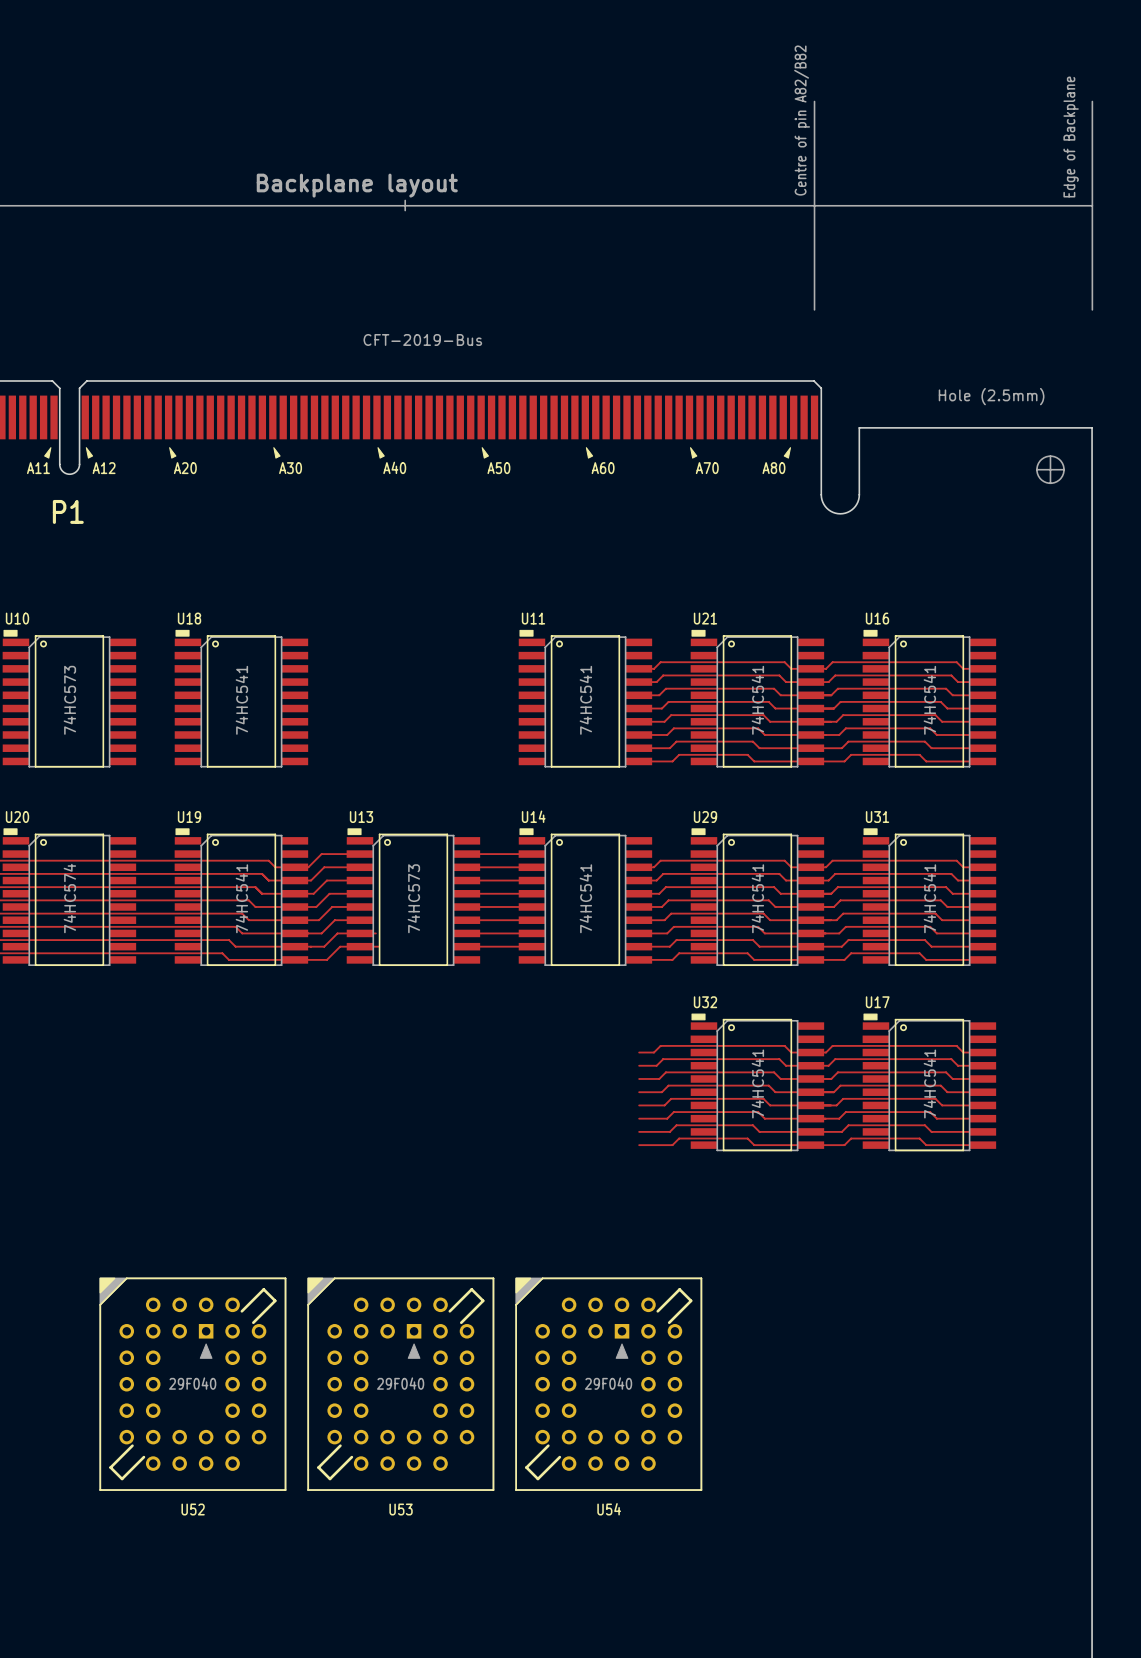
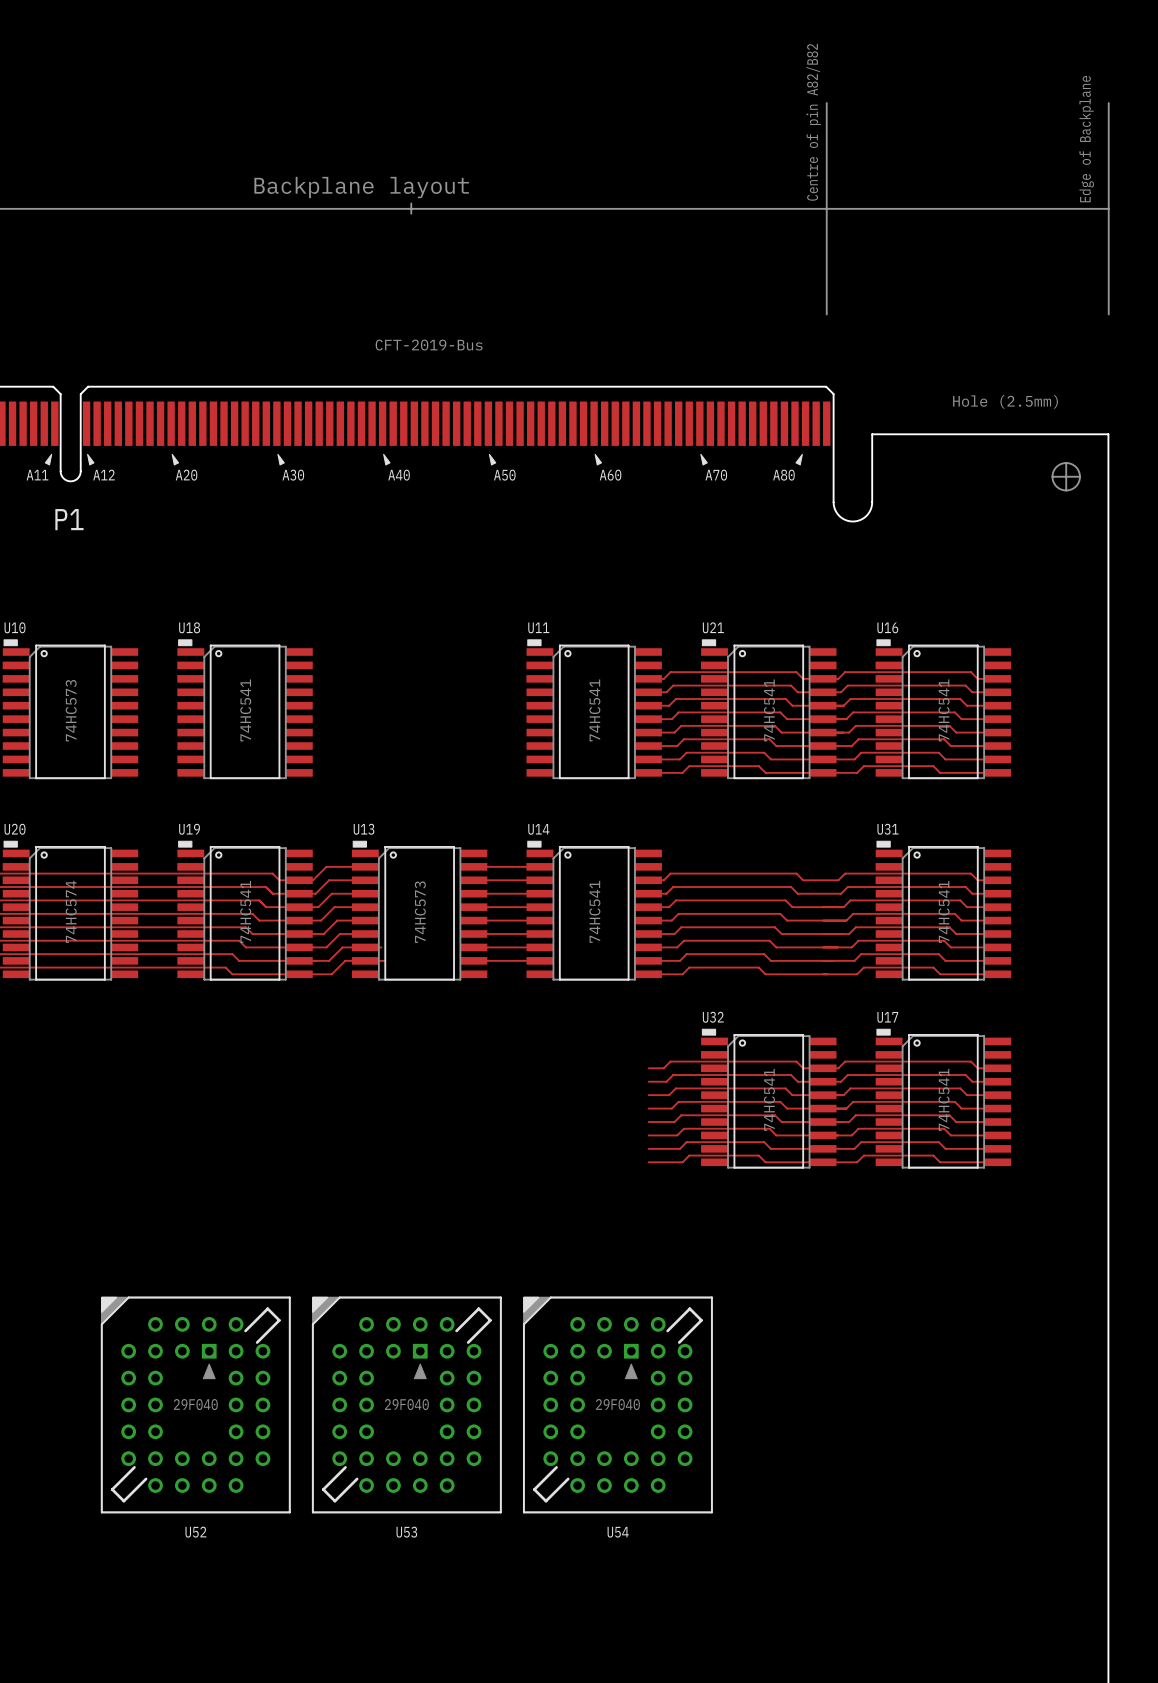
U29: 74HC541 (757, 897) -> none

